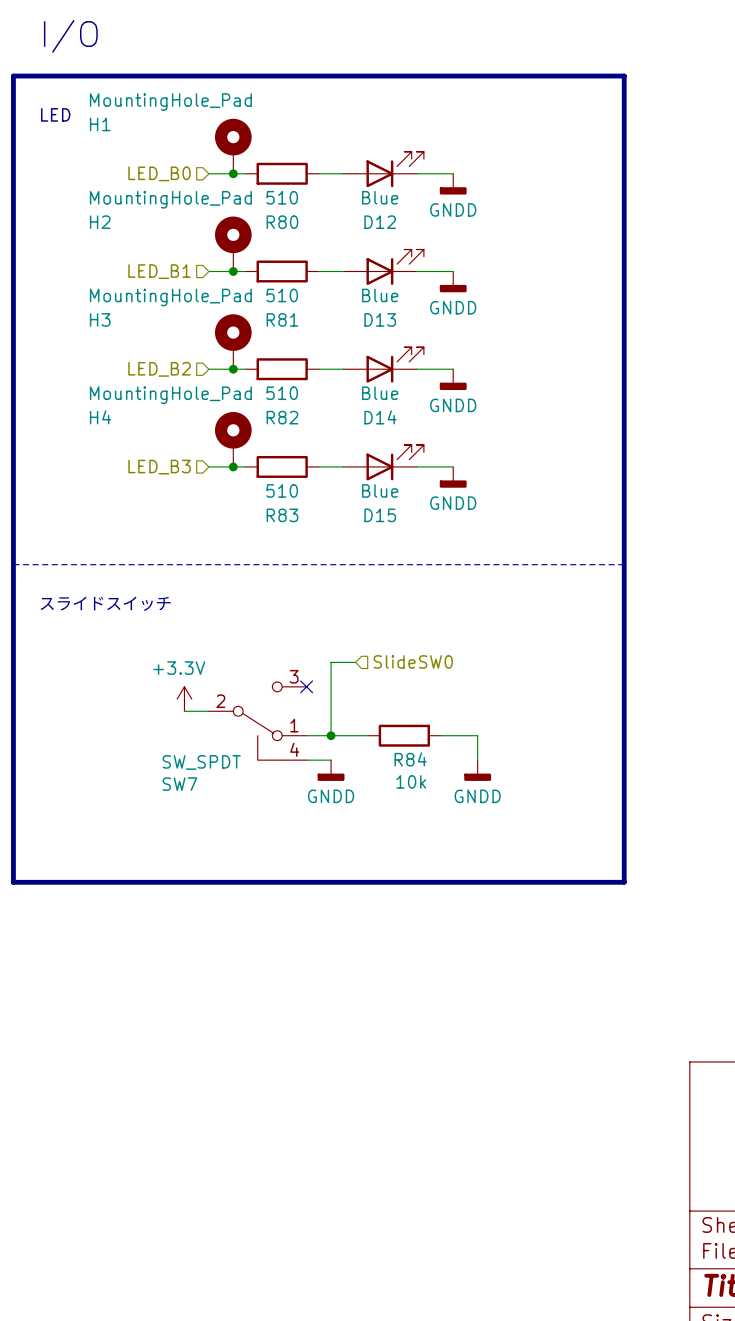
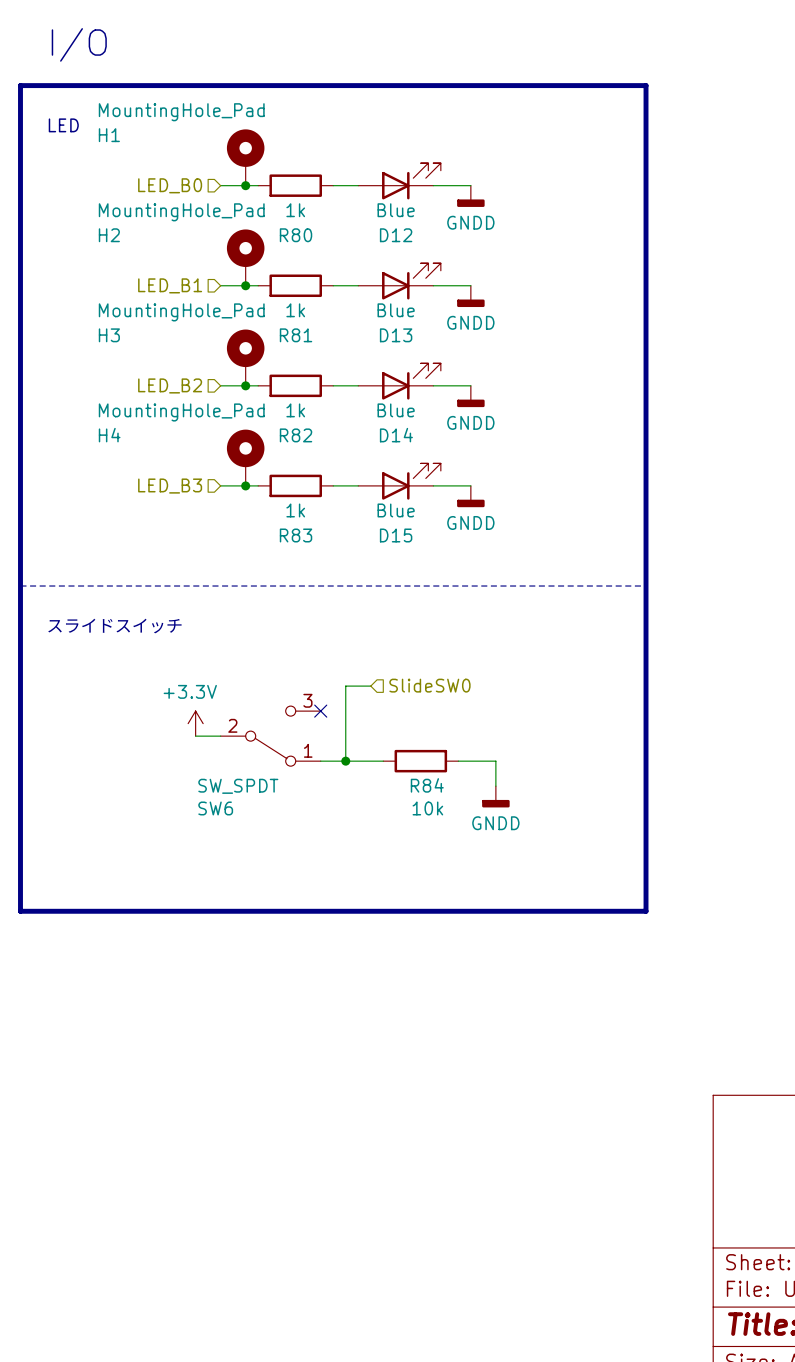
R80 value: 510 (282, 197) -> 1k (295, 210)
R81 value: 510 (282, 295) -> 1k (295, 310)
R82 value: 510 (282, 393) -> 1k (295, 410)
R83 value: 510 (282, 490) -> 1k (295, 510)
SW6: none -> SW_SPDT (270, 736)
SW7: SW_SPDT (257, 721) -> none
wire: (306, 760) (331, 760) -> none
power symbol: GNDD (331, 770) -> none

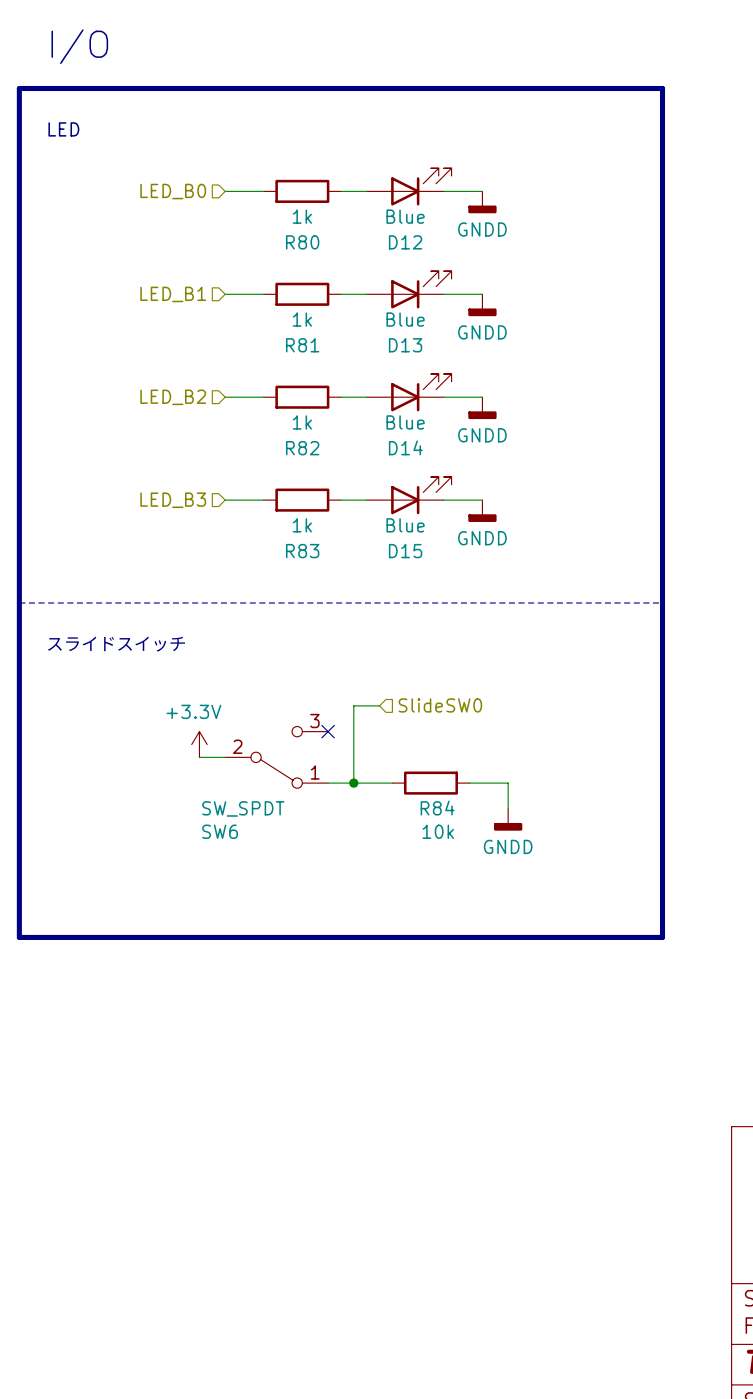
H1: MountingHole_Pad (245, 157) -> none
junction: (245, 185) -> none
H2: MountingHole_Pad (245, 257) -> none
junction: (245, 285) -> none
H3: MountingHole_Pad (245, 357) -> none
junction: (245, 385) -> none
H4: MountingHole_Pad (245, 457) -> none
junction: (245, 485) -> none

